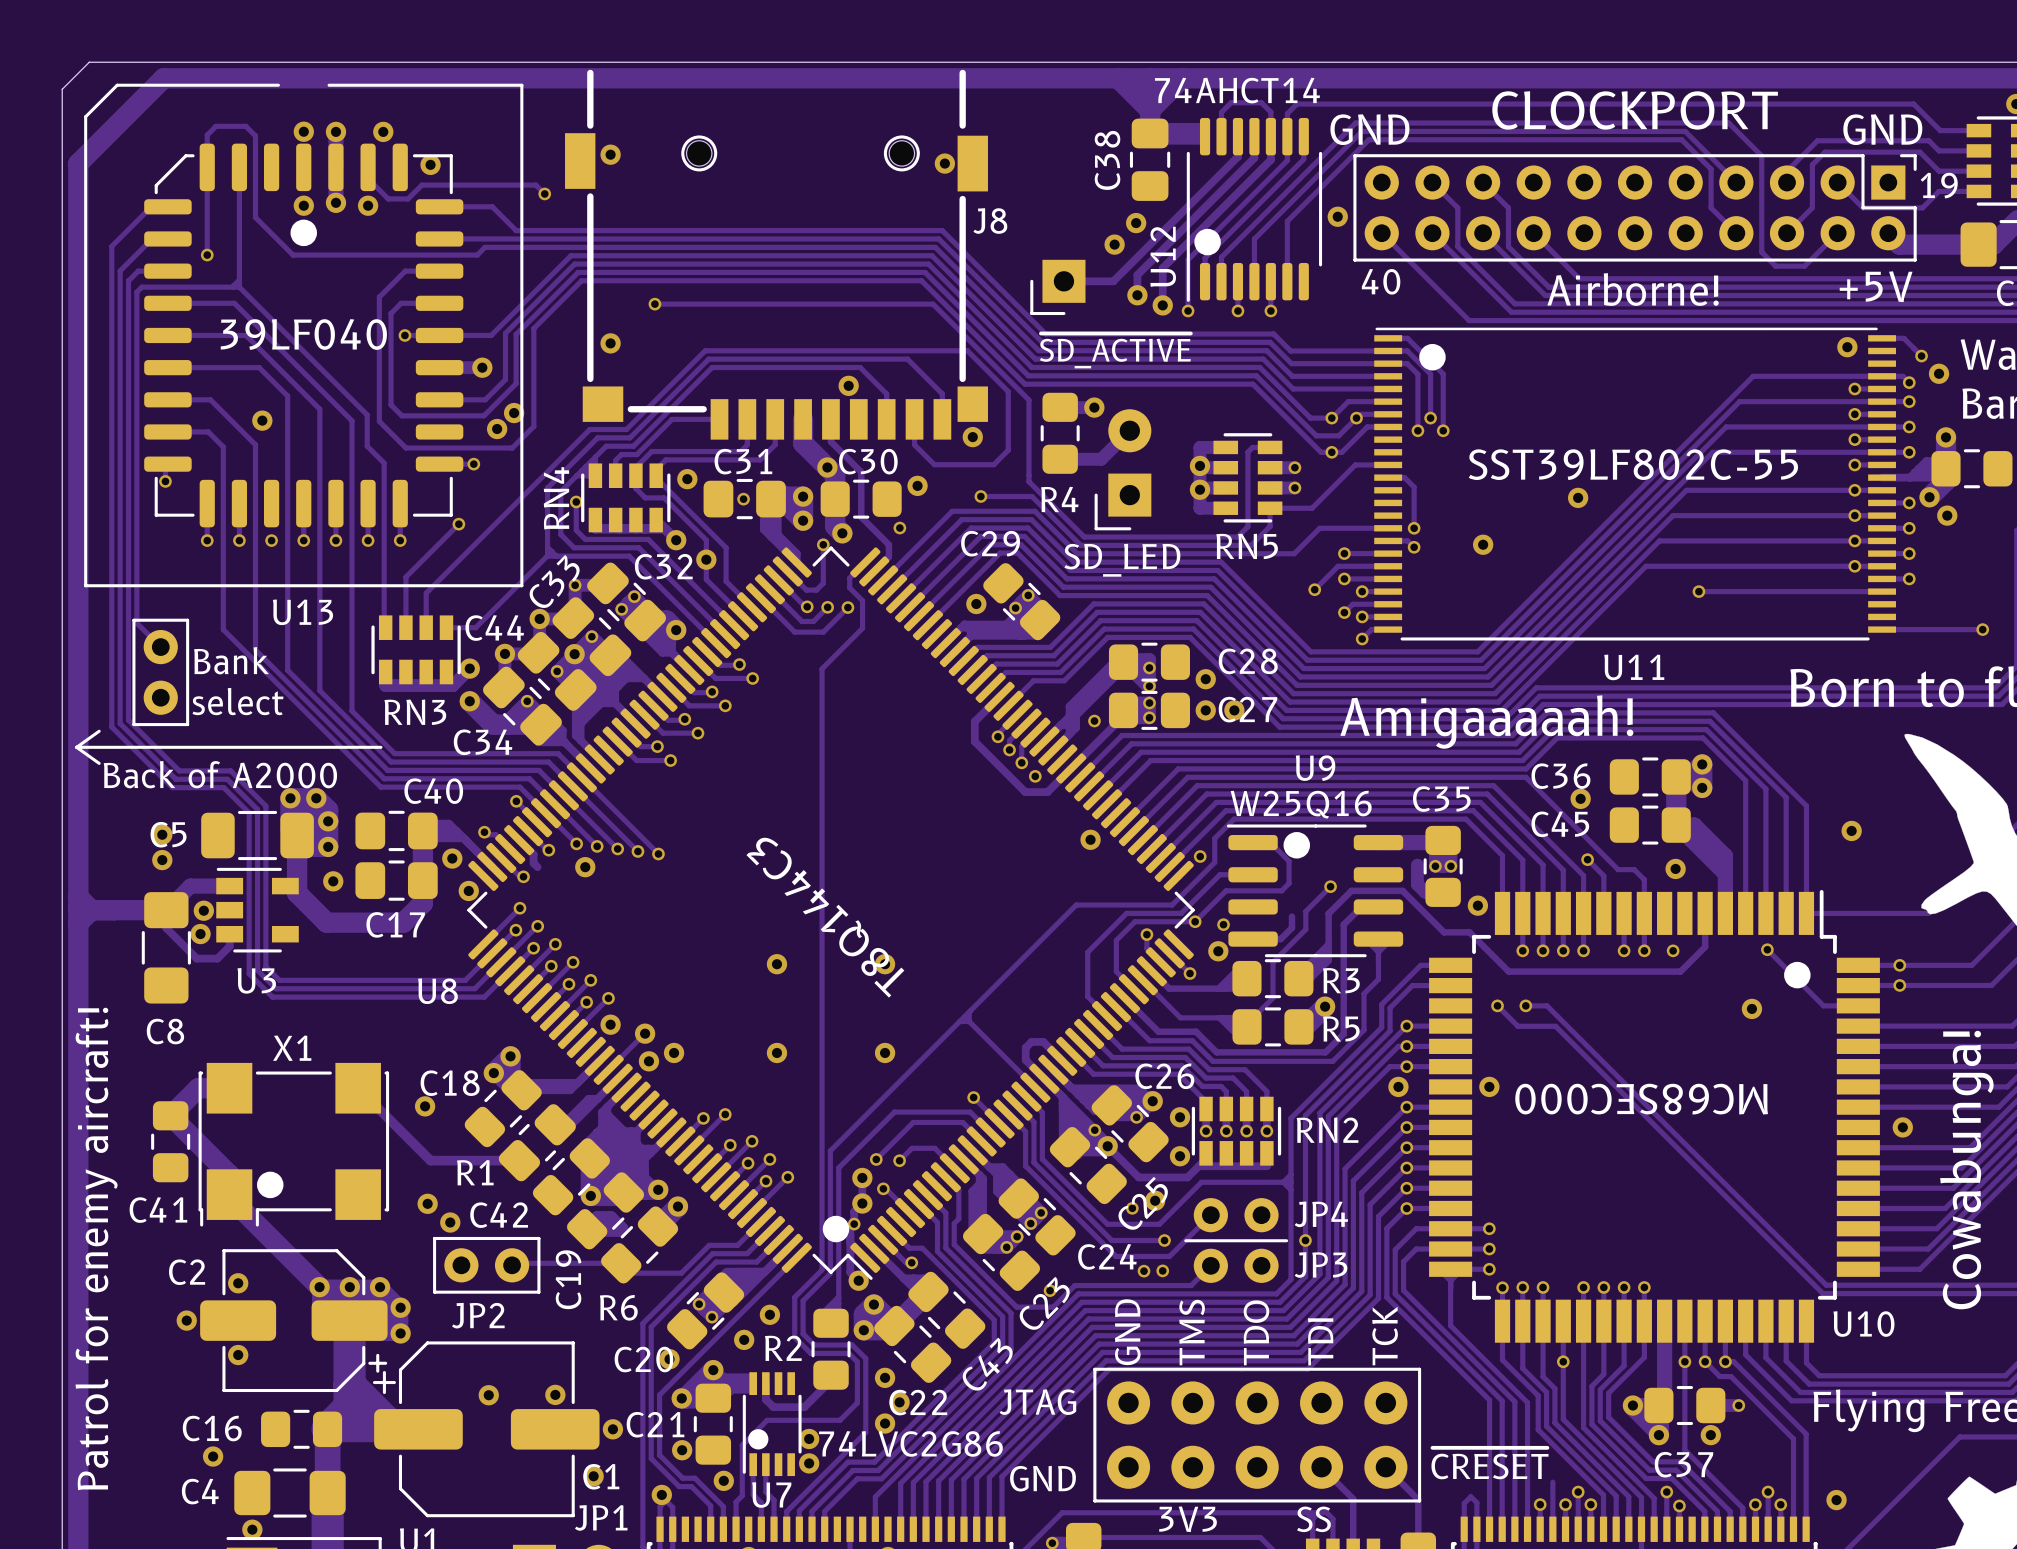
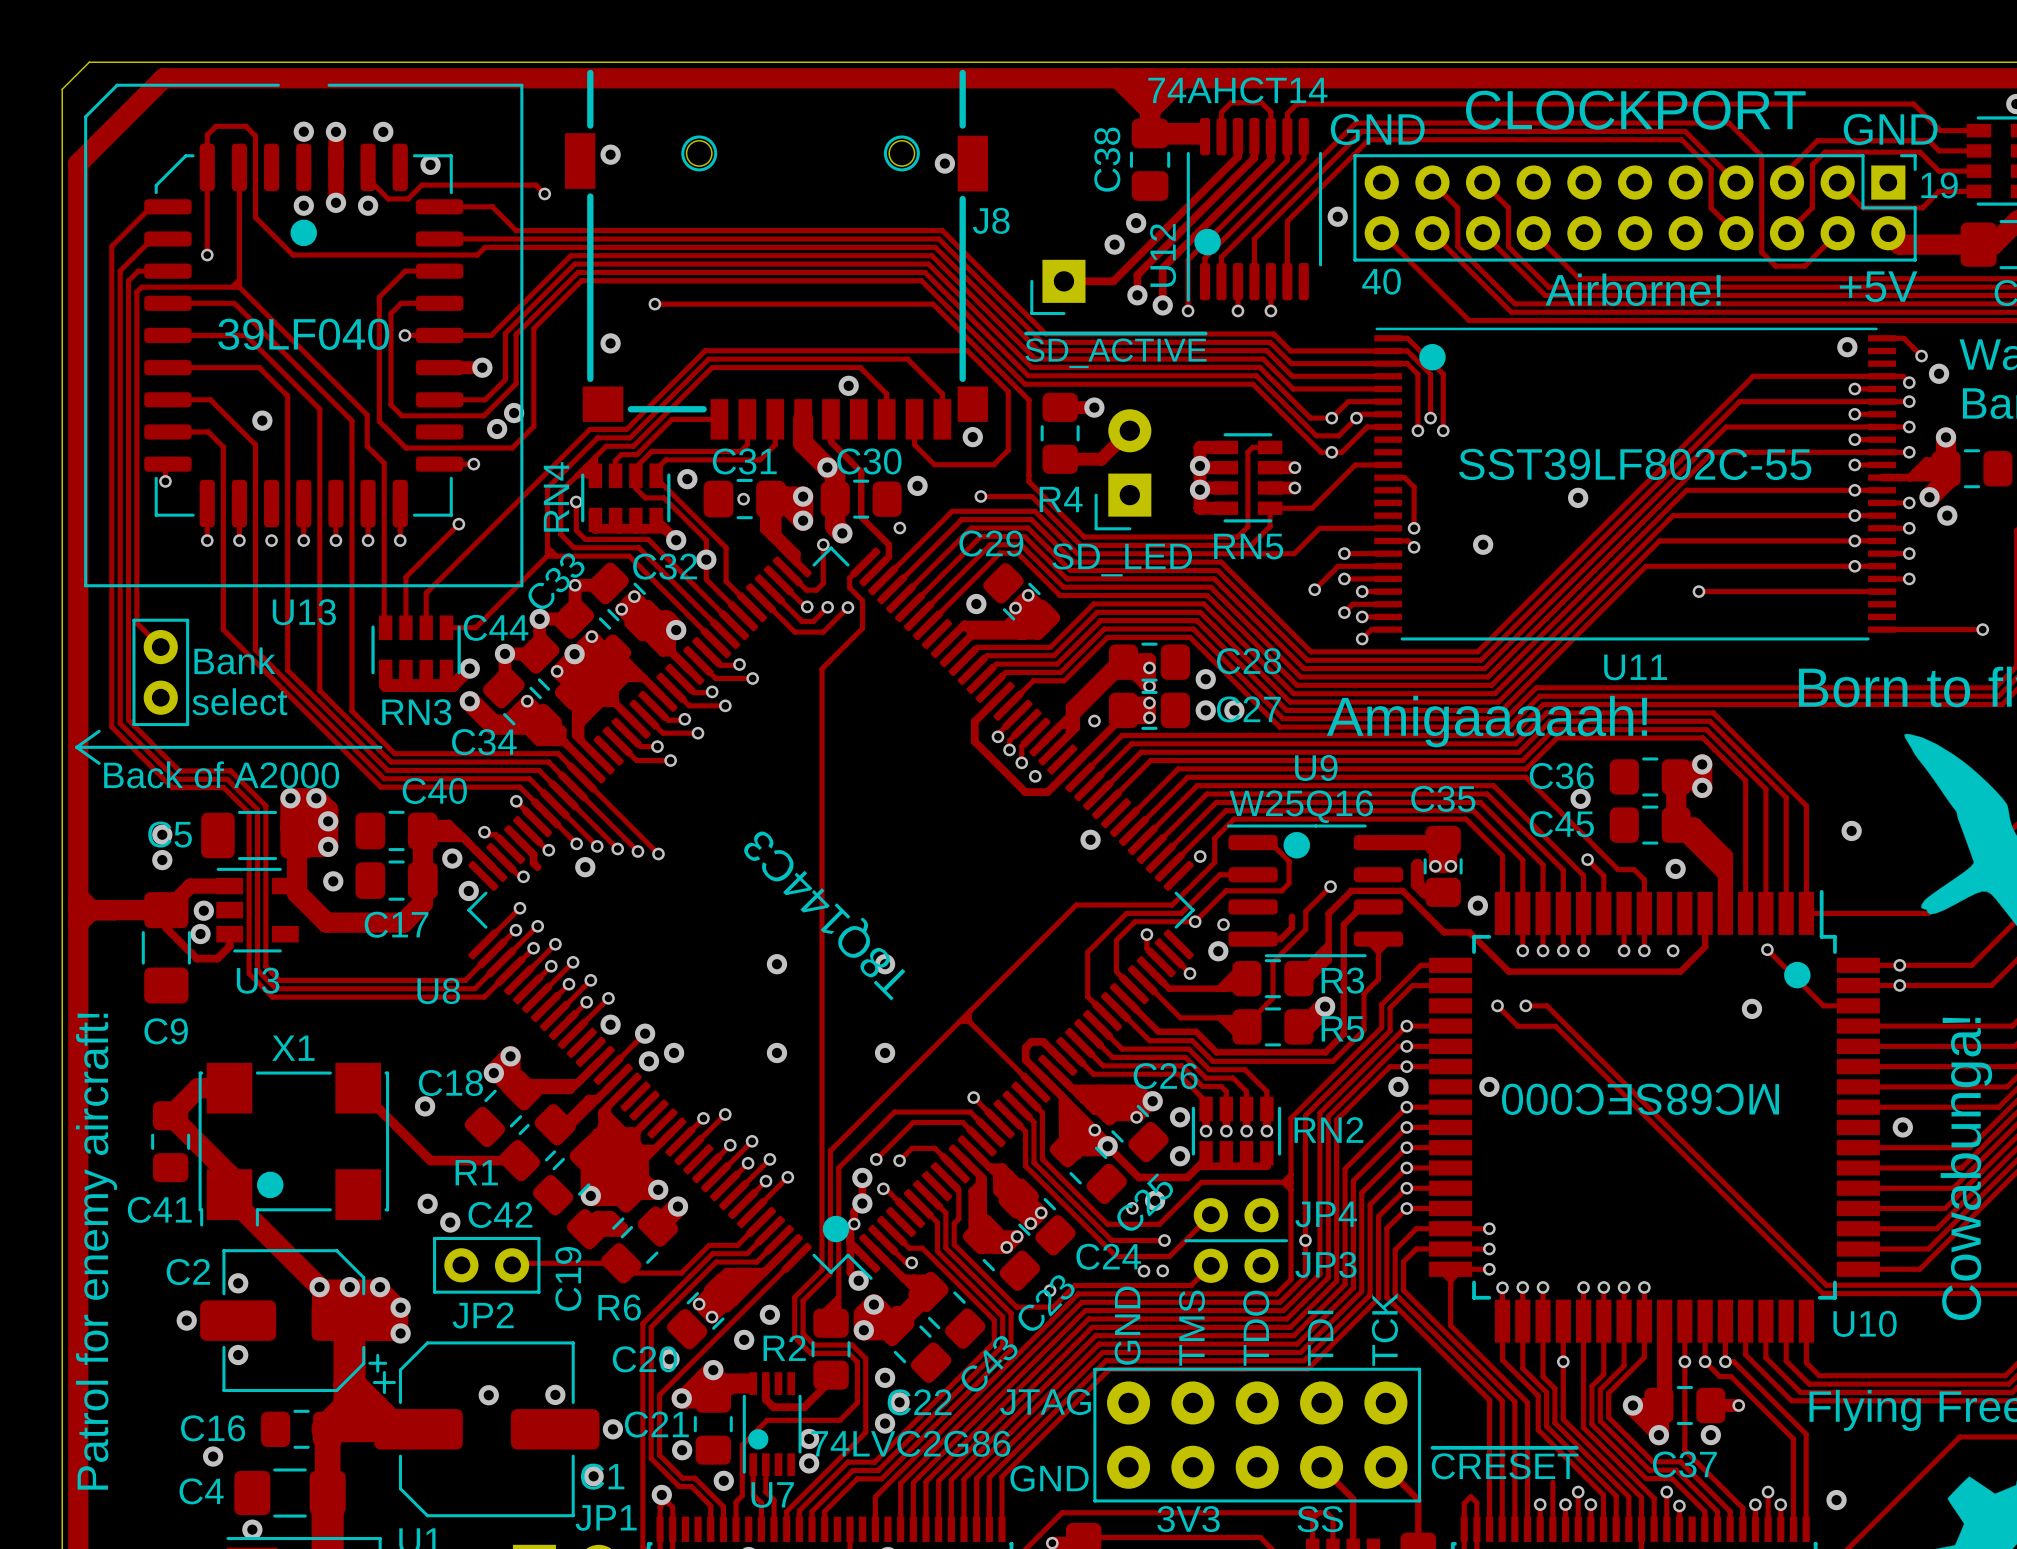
C8 name: C8 (165, 1031) -> C9 (166, 1031)

